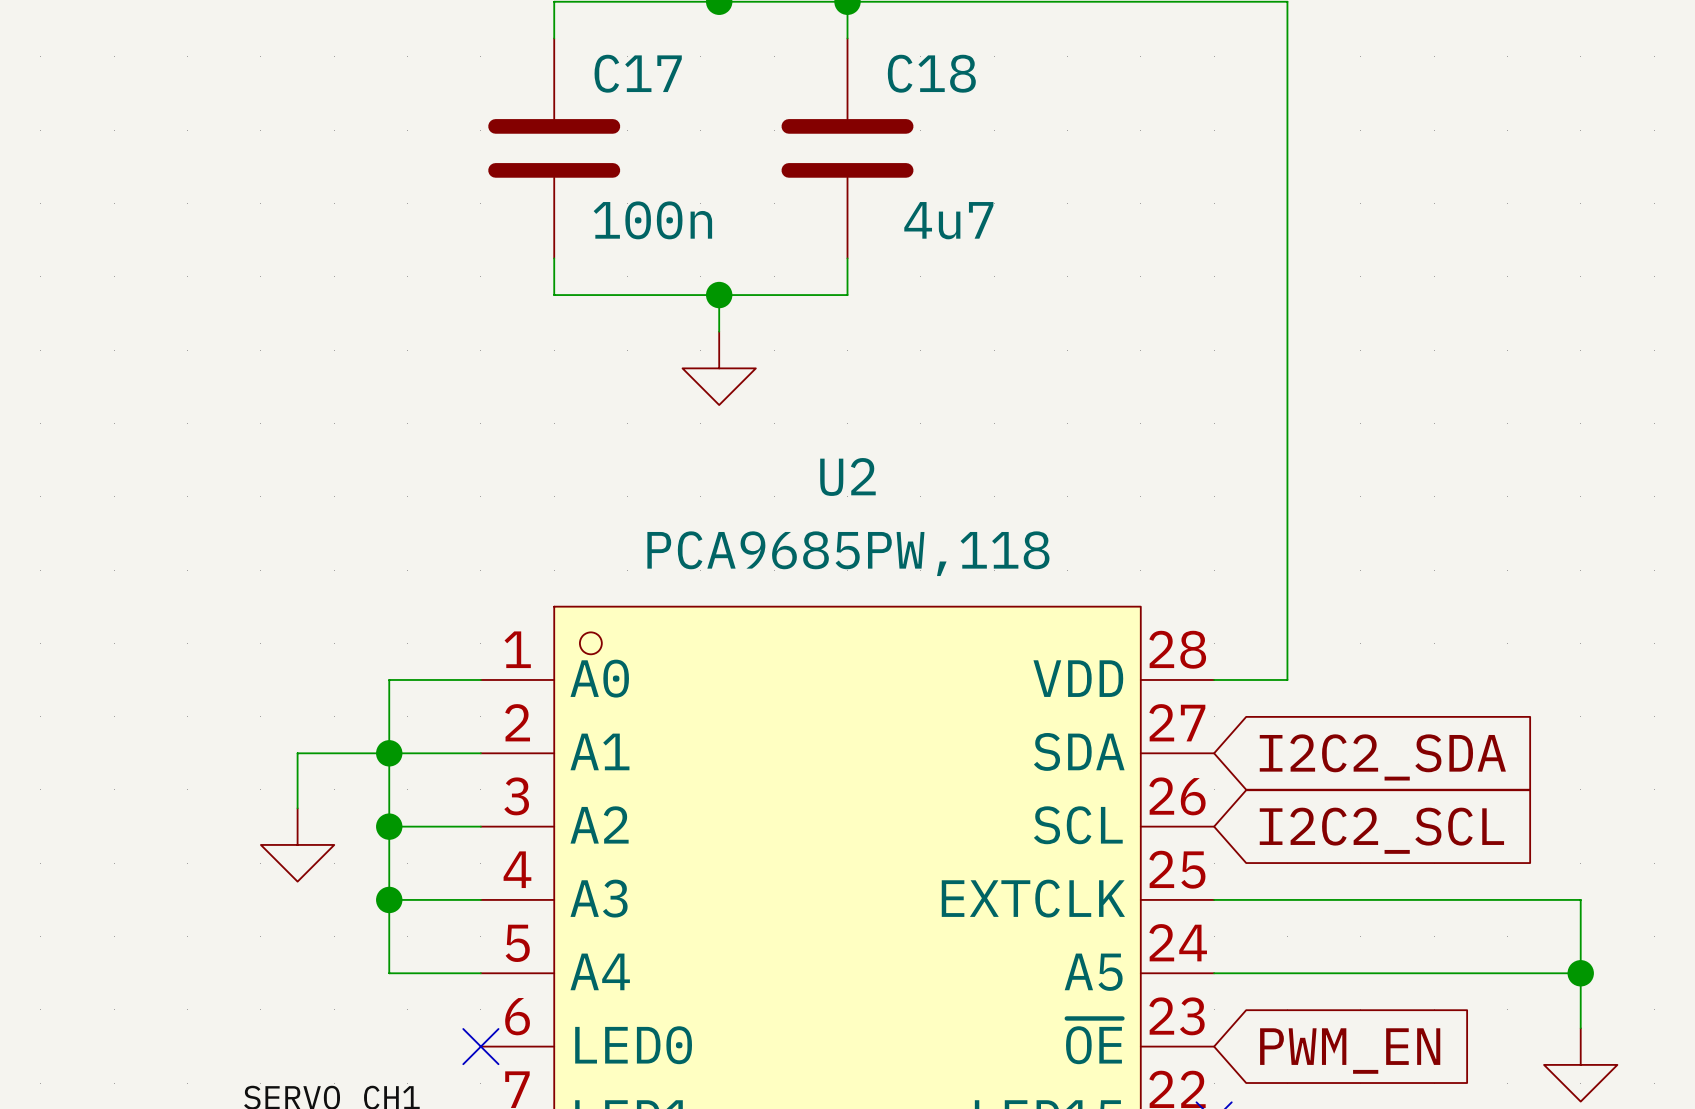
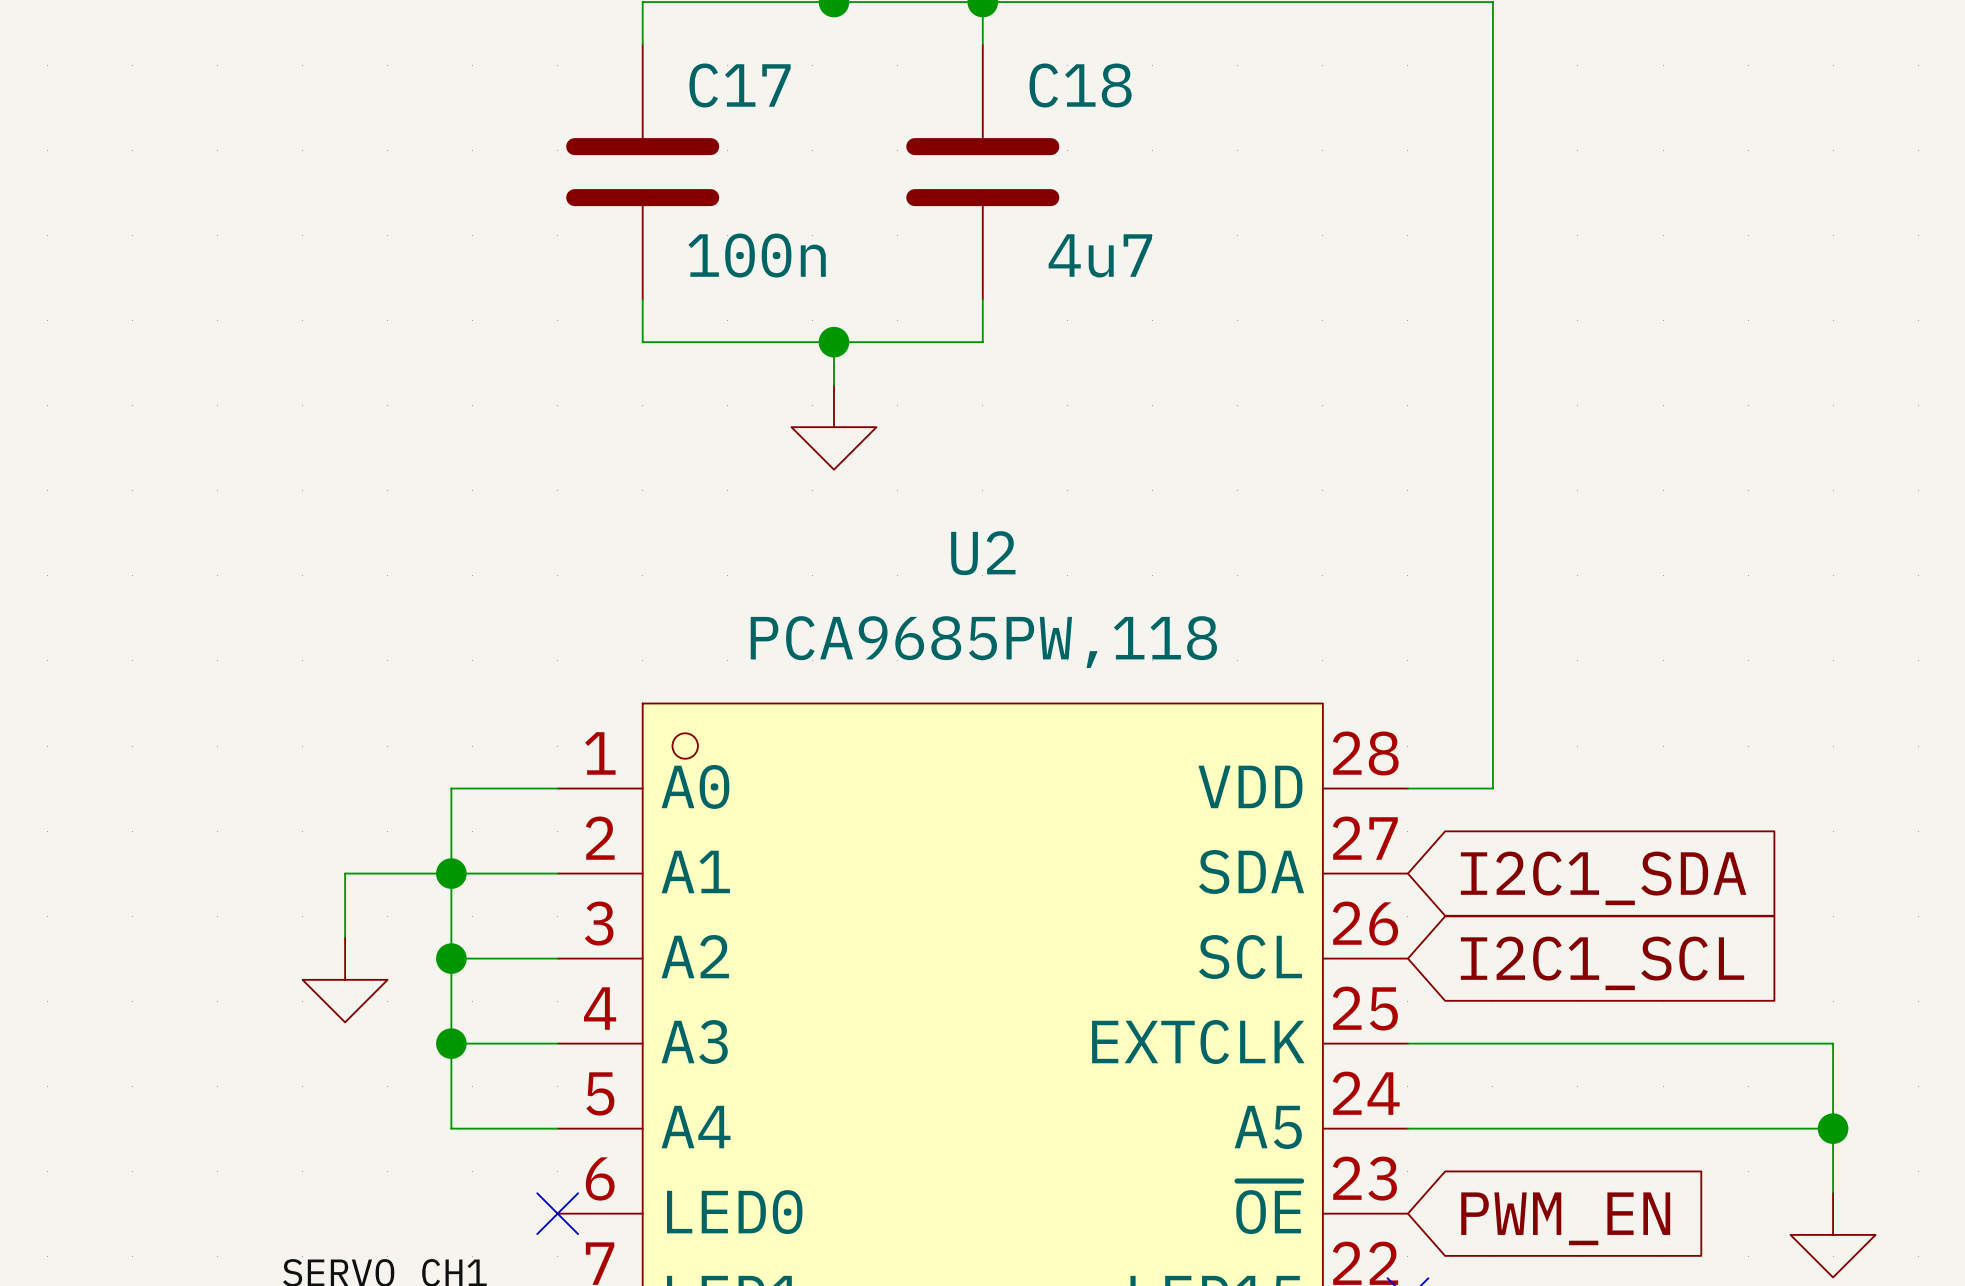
global label: I2C2_SDA (1382, 757) -> I2C1_SDA (1603, 878)
global label: I2C2_SCL (1381, 830) -> I2C1_SCL (1602, 963)

